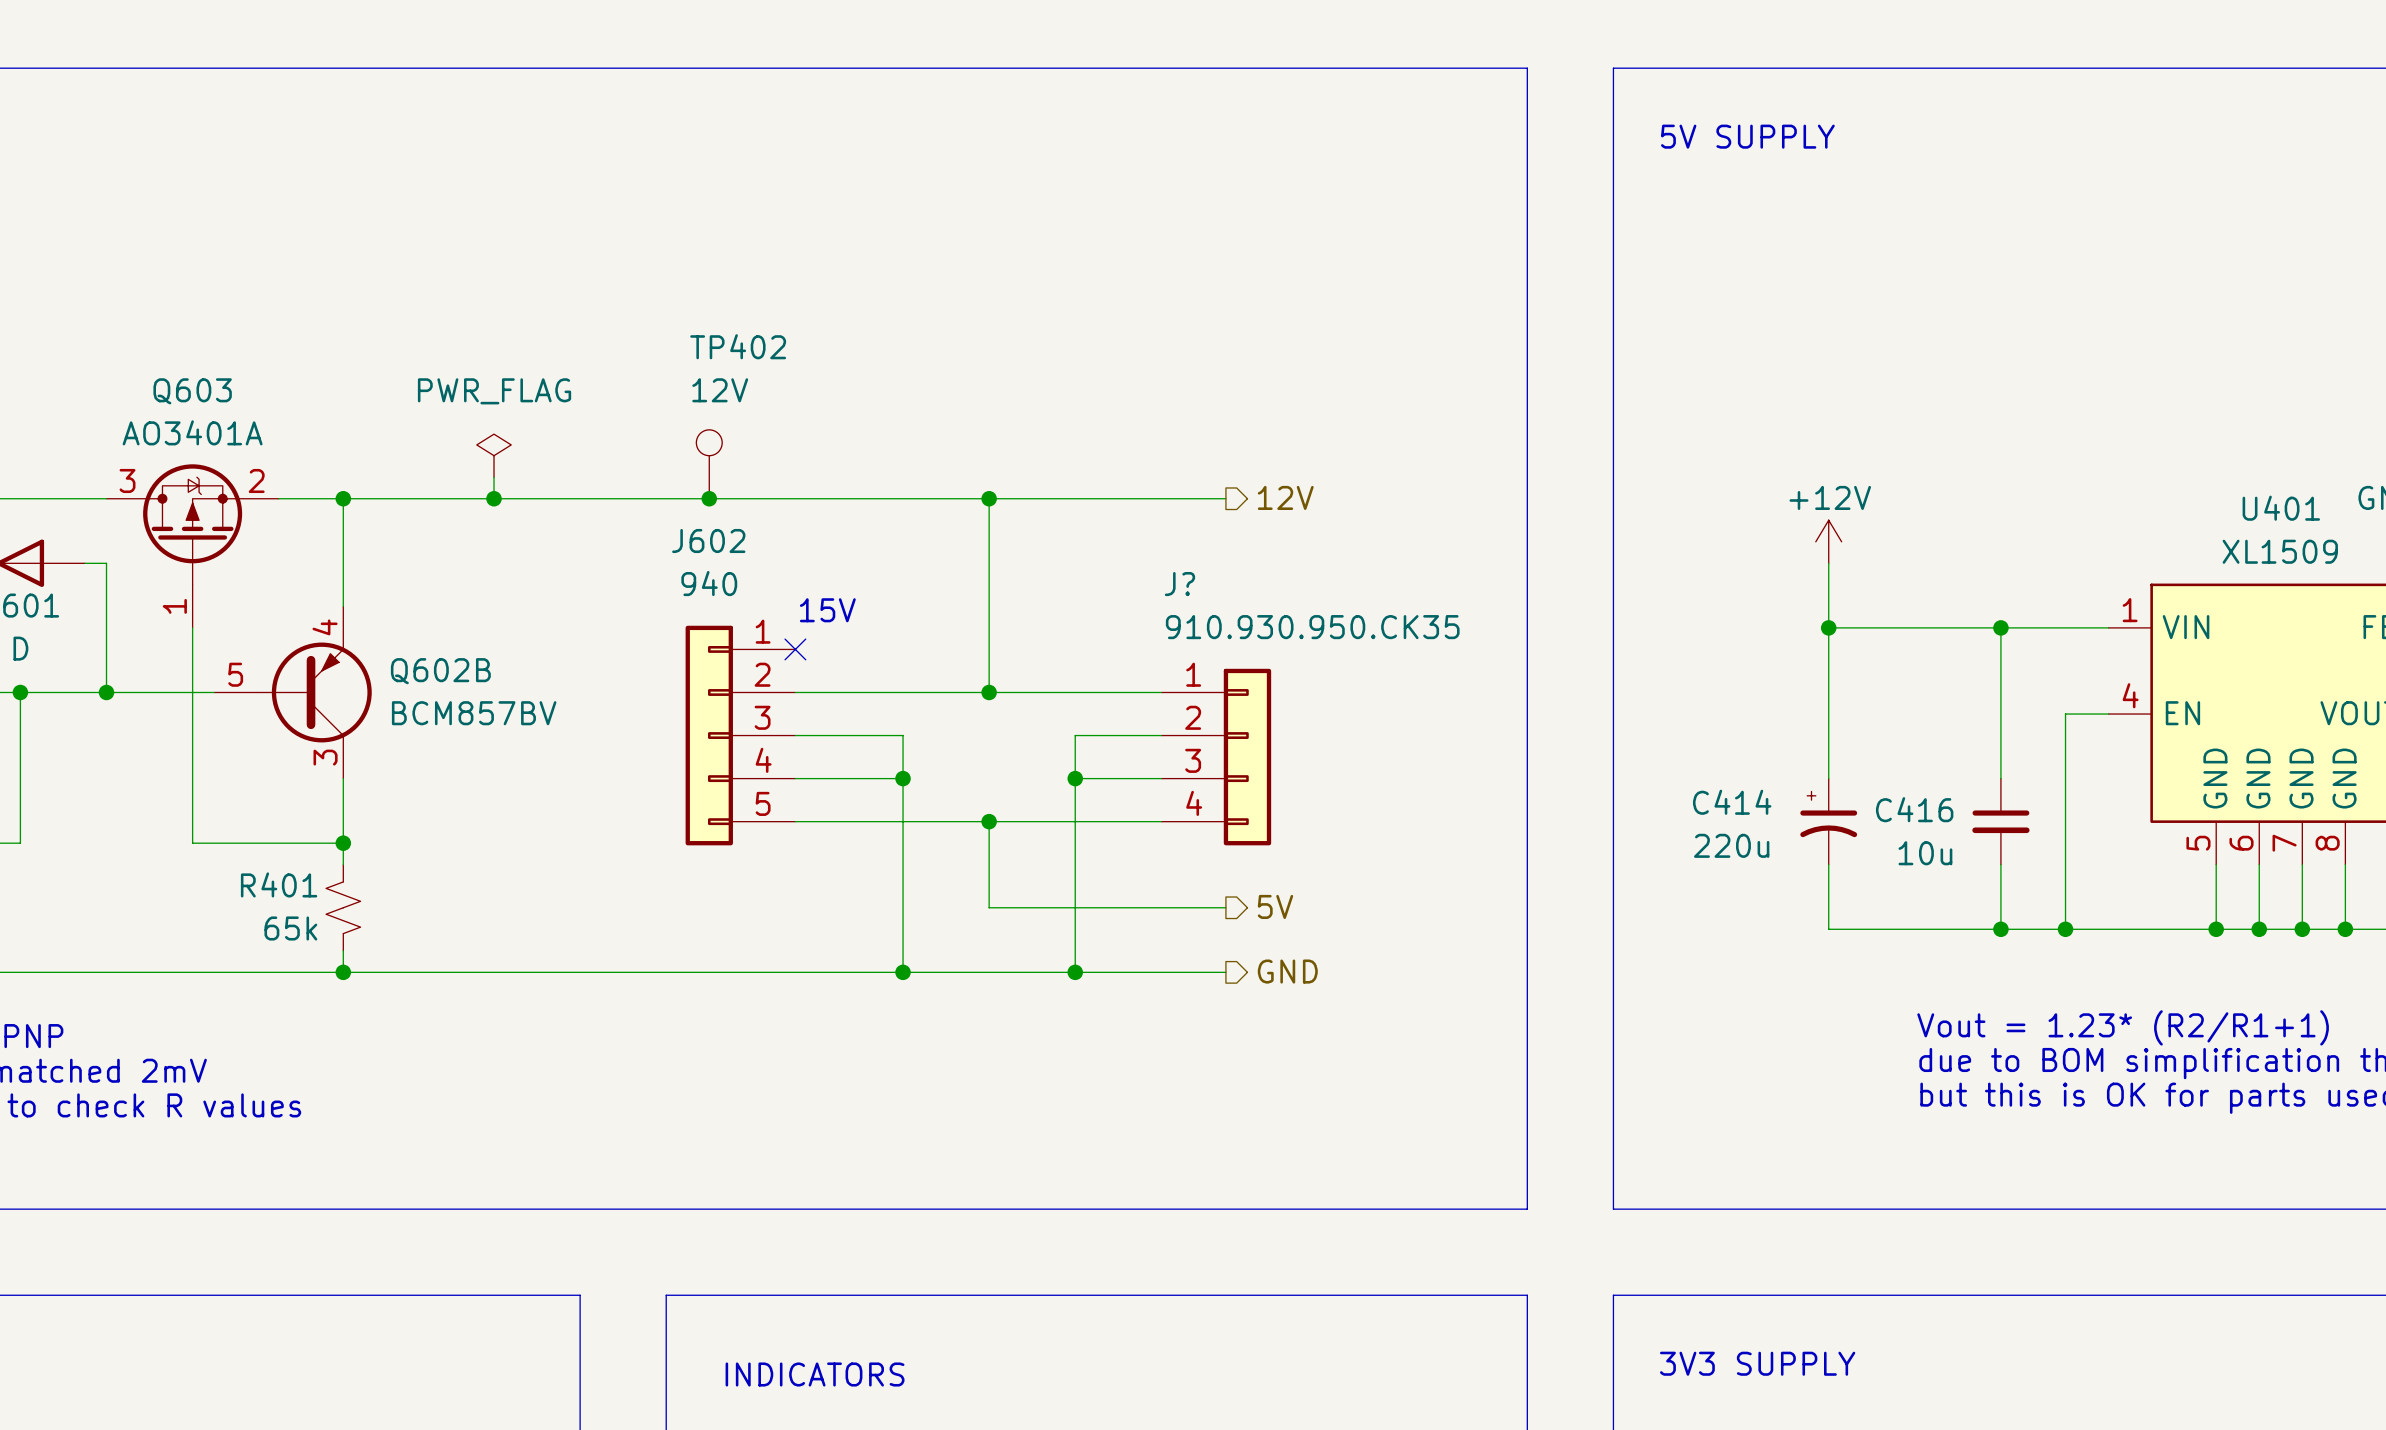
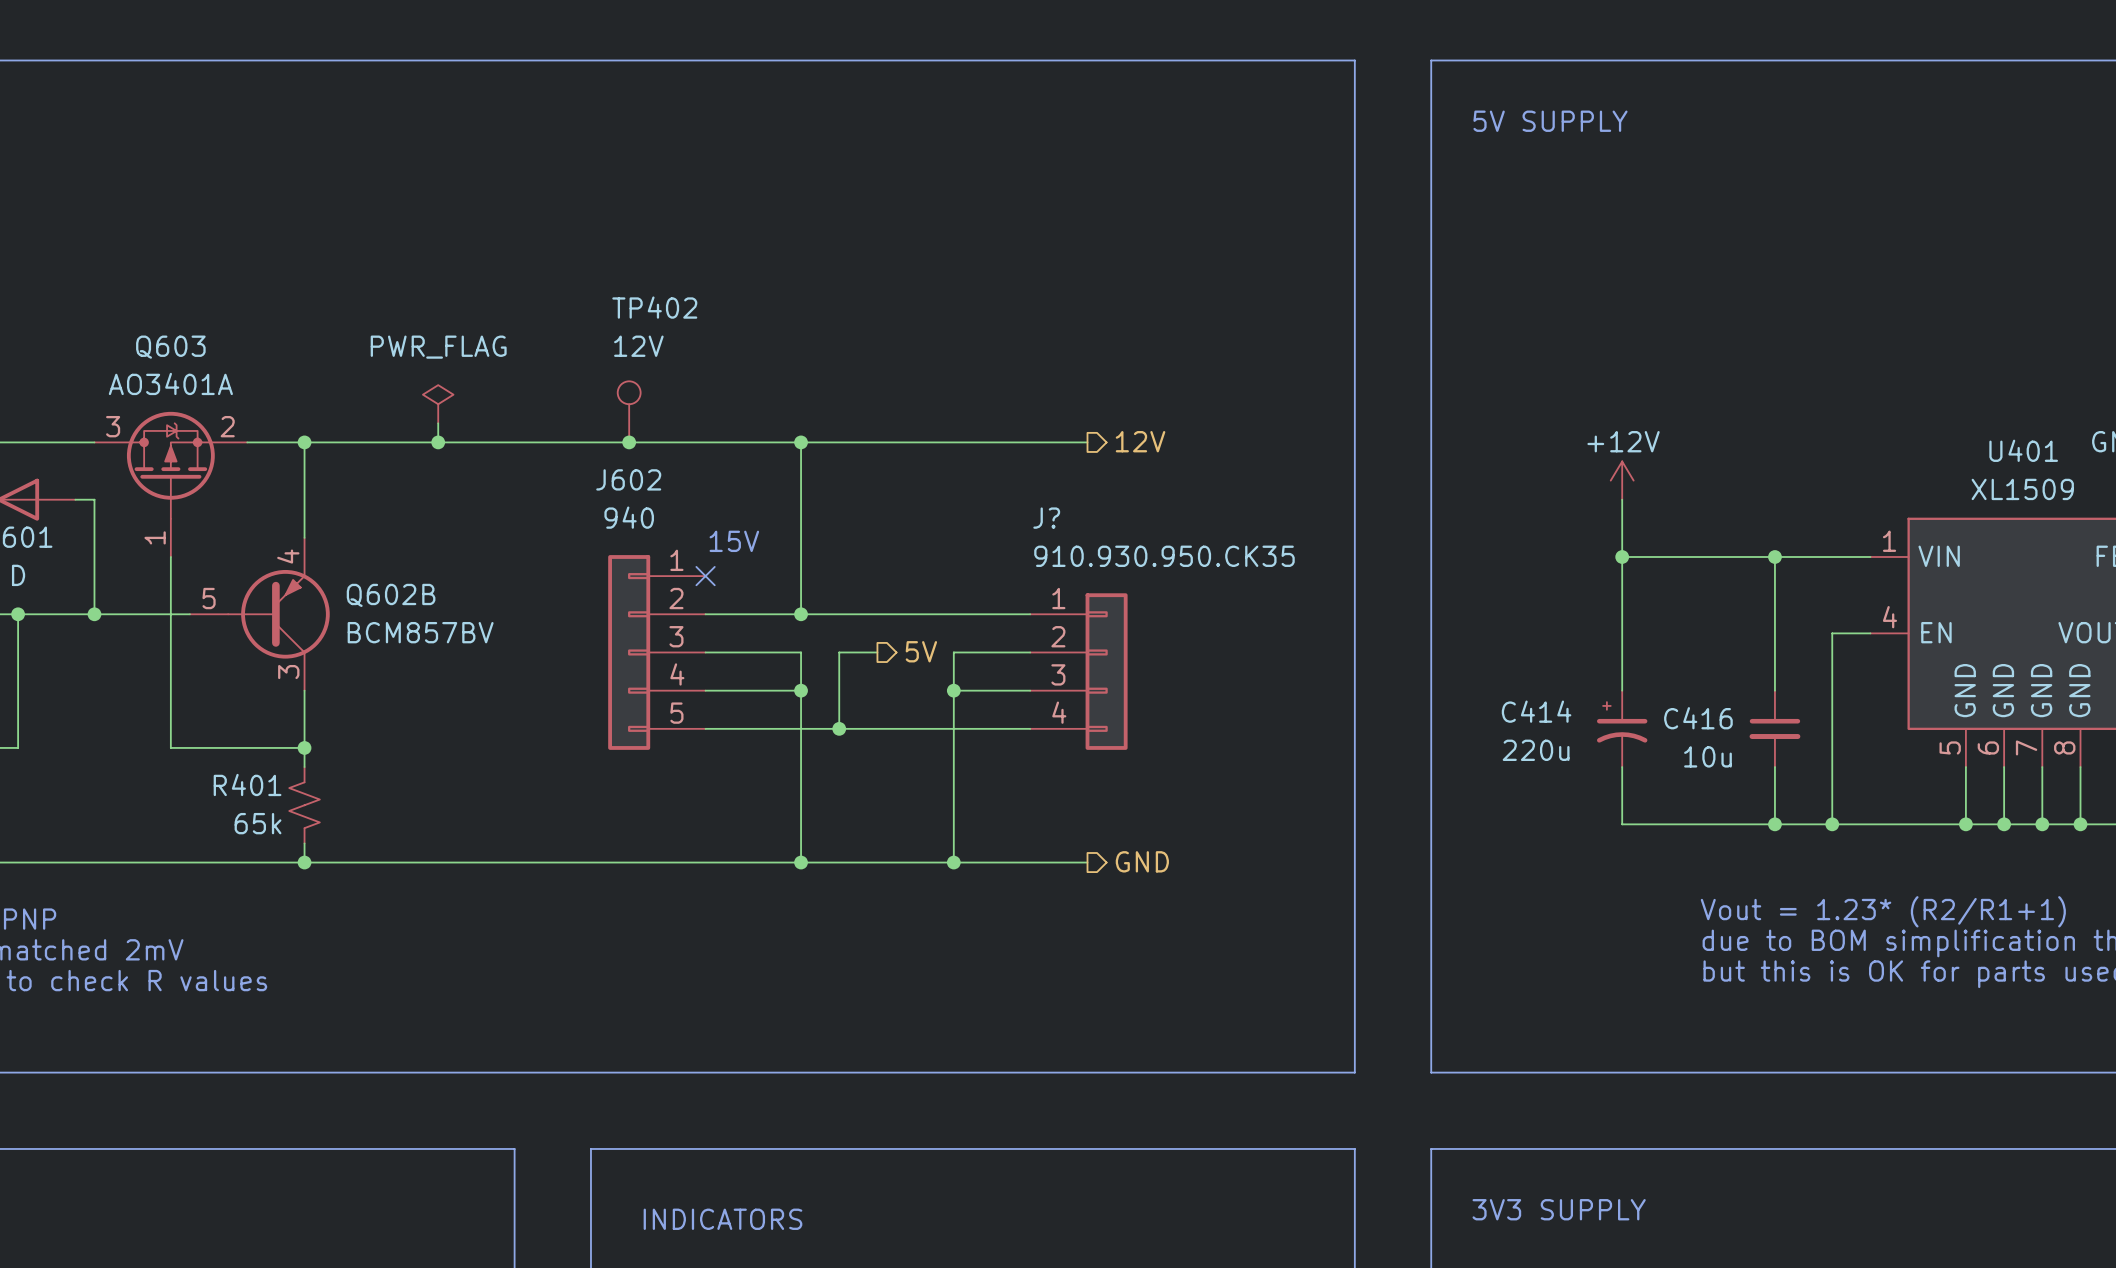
wire: (989, 498) (989, 692) -> (801, 442) (801, 614)
junction position: (989, 498) -> (801, 442)
junction: none -> (801, 614)
junction: (989, 692) -> none
wire: none -> (877, 652) (839, 652) (839, 728)
wire: (989, 821) (989, 907) (1225, 907) -> none
junction position: (989, 821) -> (839, 728)
hierarchical label position: 5V (1275, 906) -> 5V (921, 651)

